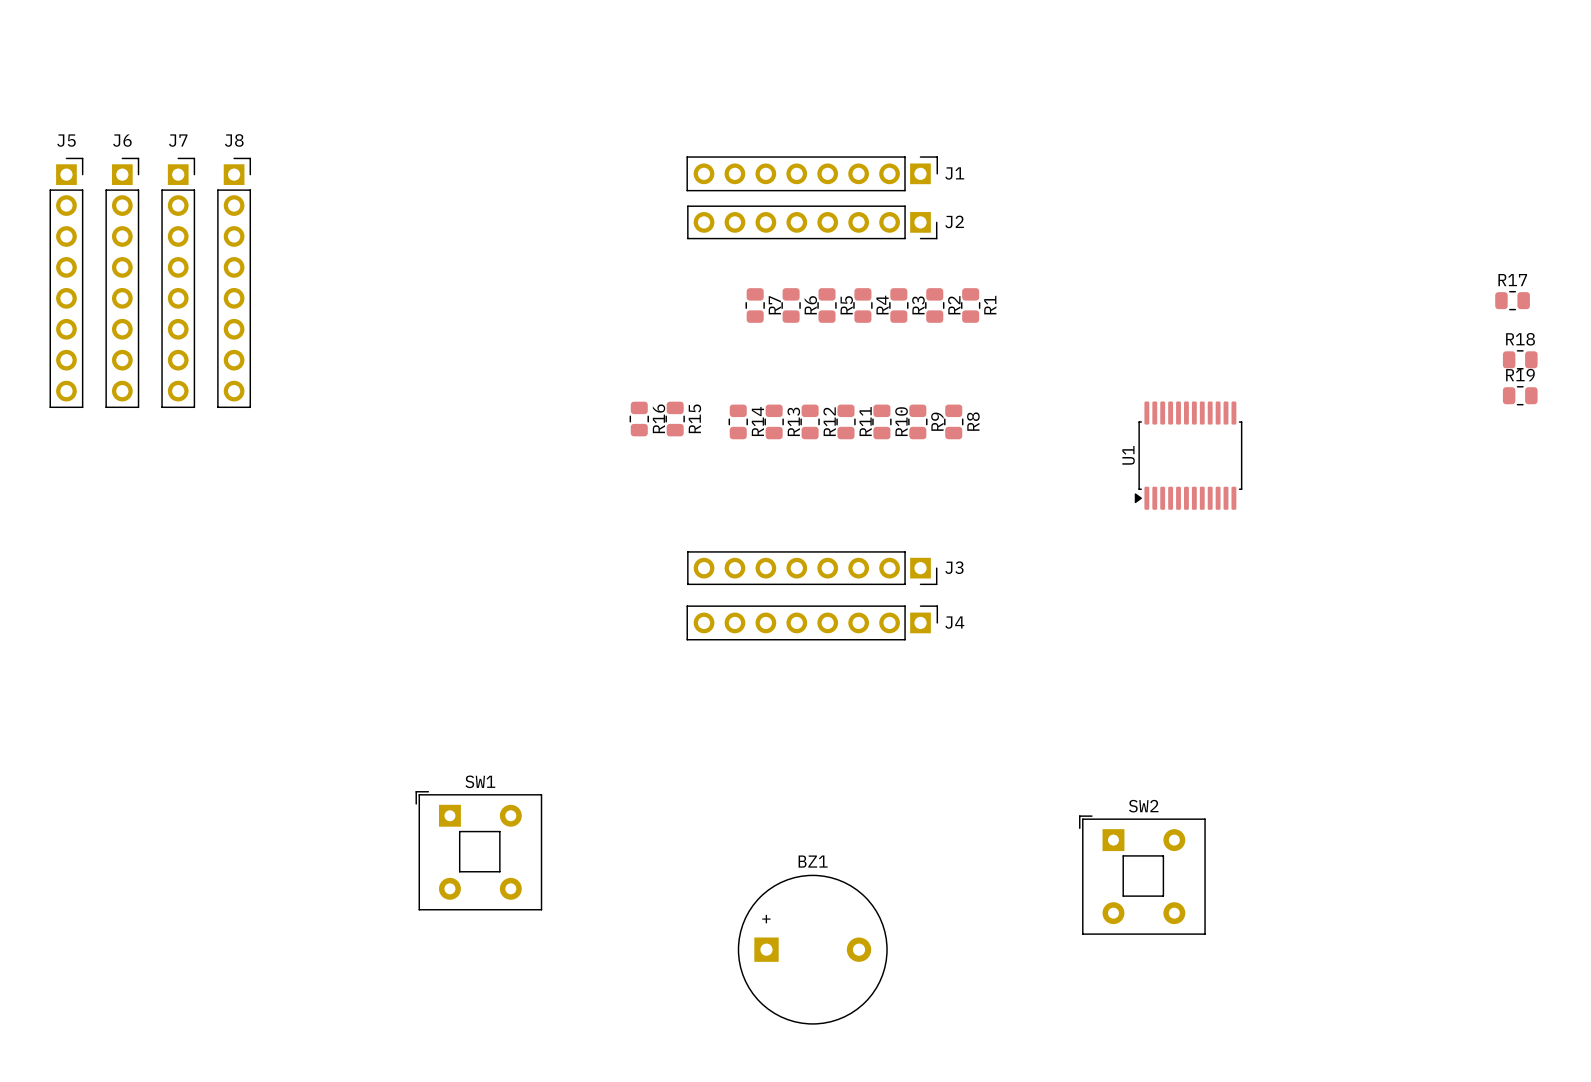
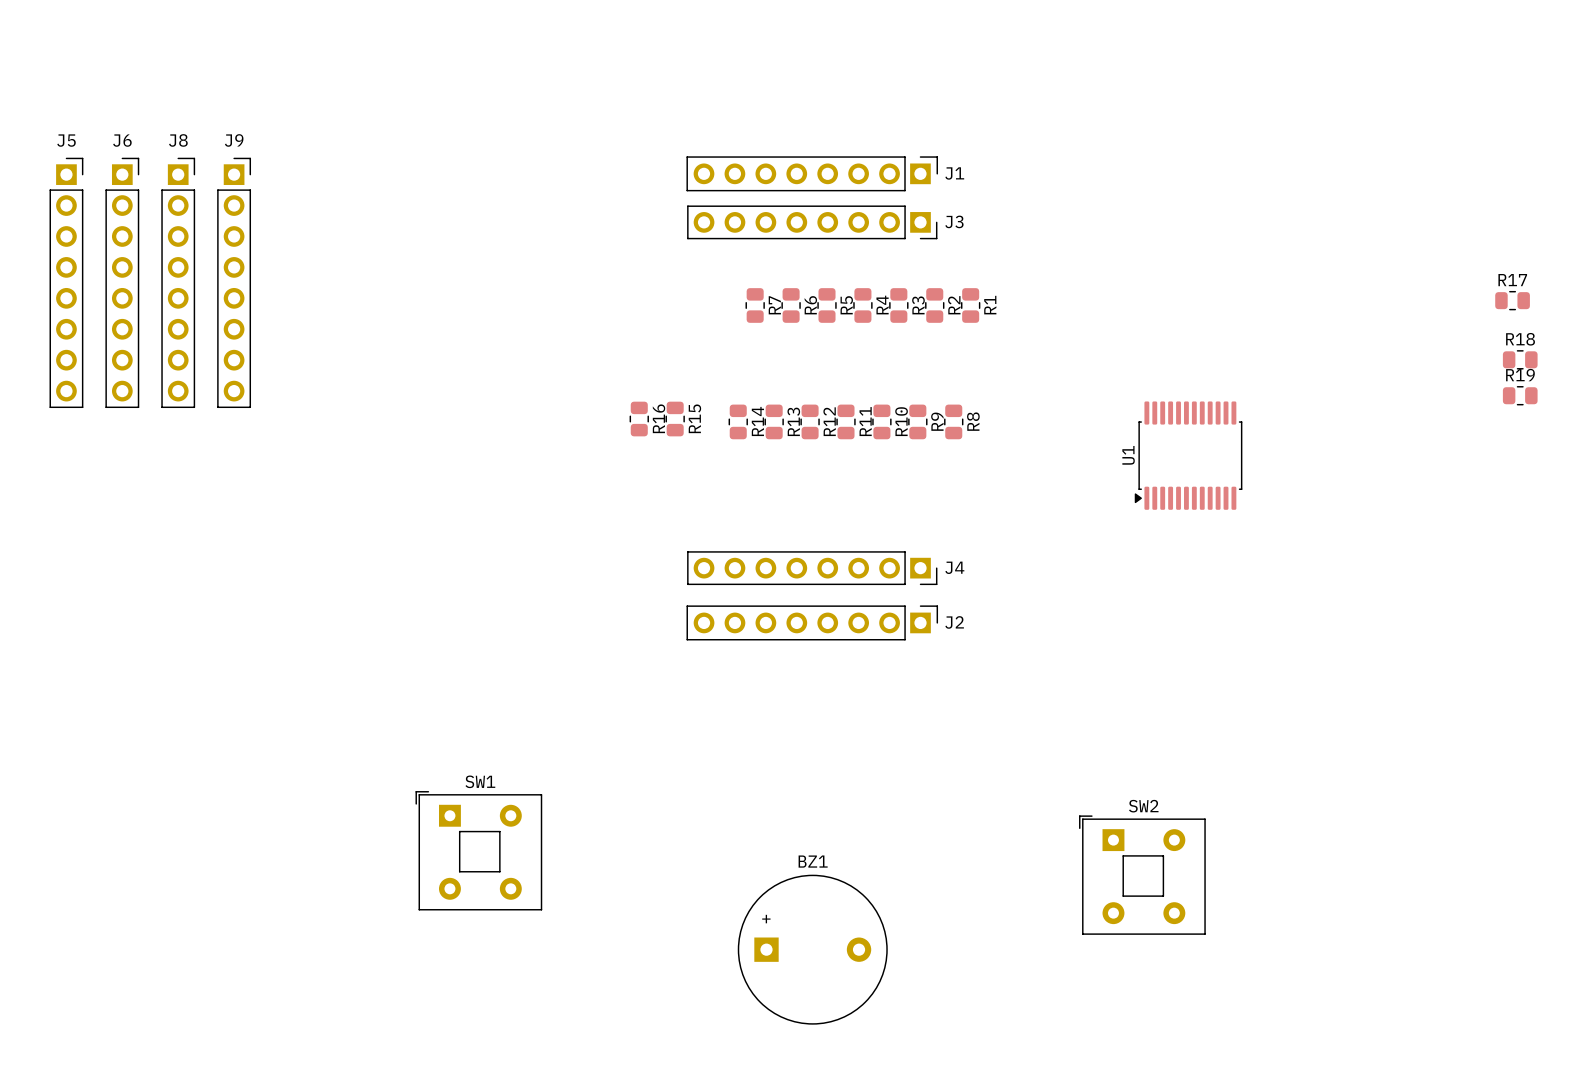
J7 name: J7 (178, 140) -> J8 (178, 140)
J8 name: J8 (234, 140) -> J9 (234, 140)
J2 name: J2 (954, 221) -> J3 (954, 221)
J3 name: J3 (954, 567) -> J4 (954, 567)
J4 name: J4 (954, 622) -> J2 (954, 622)

